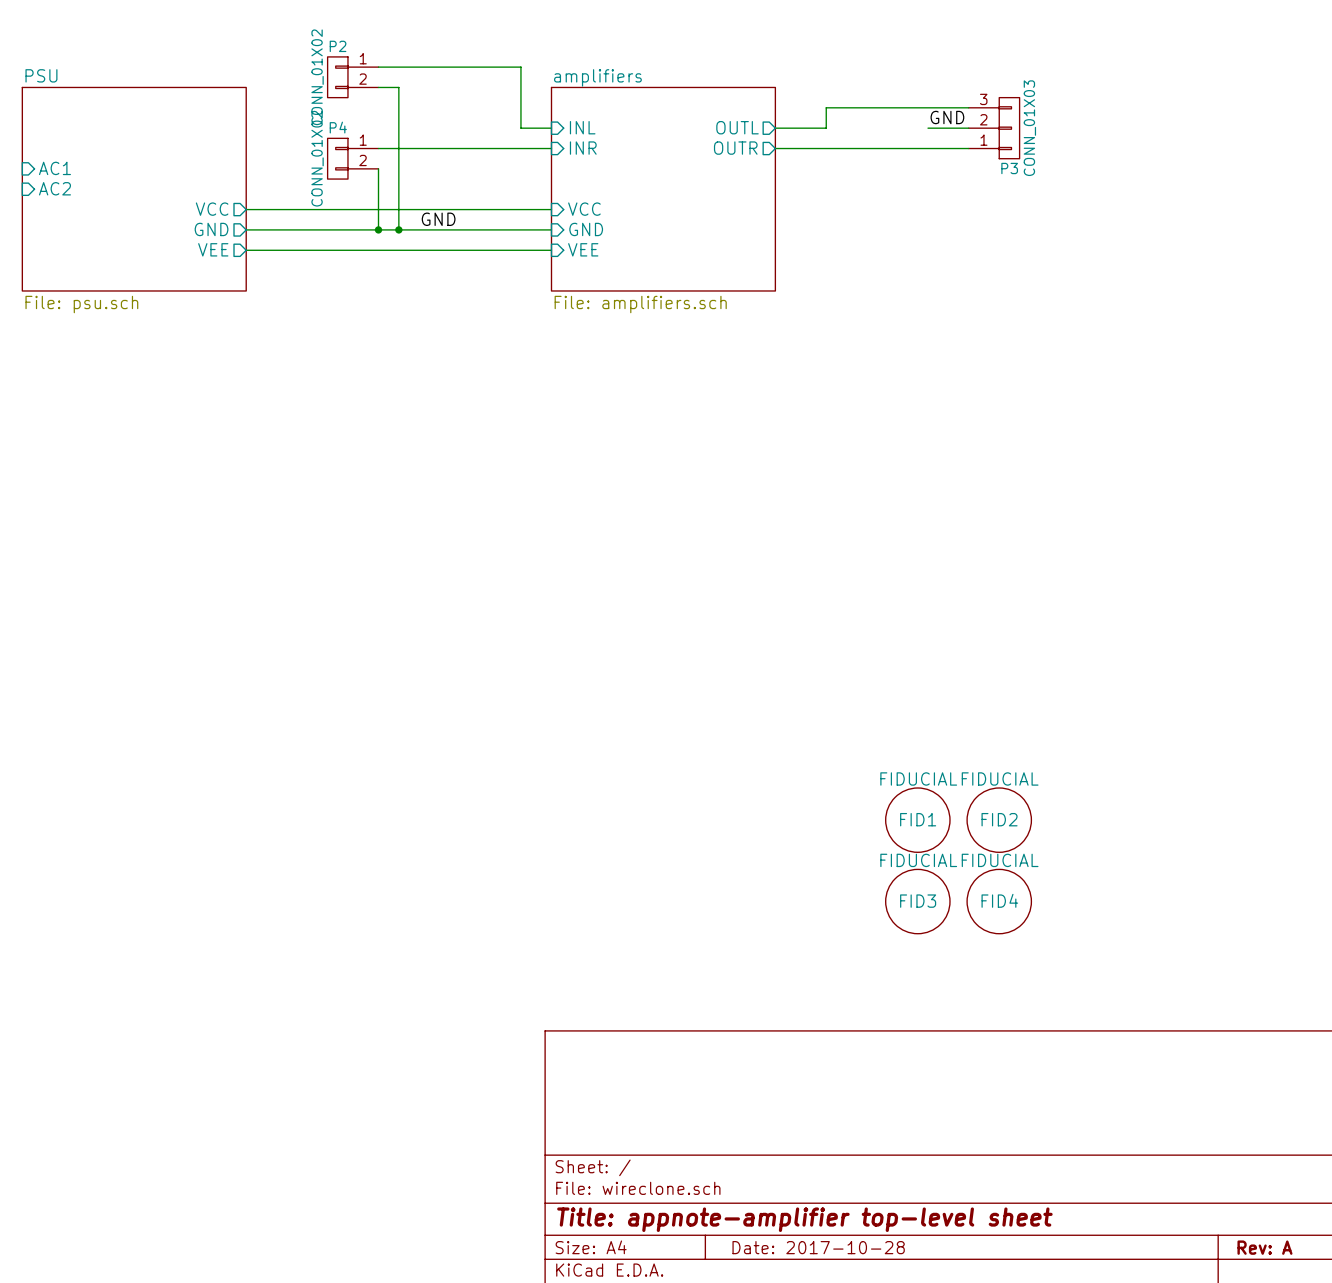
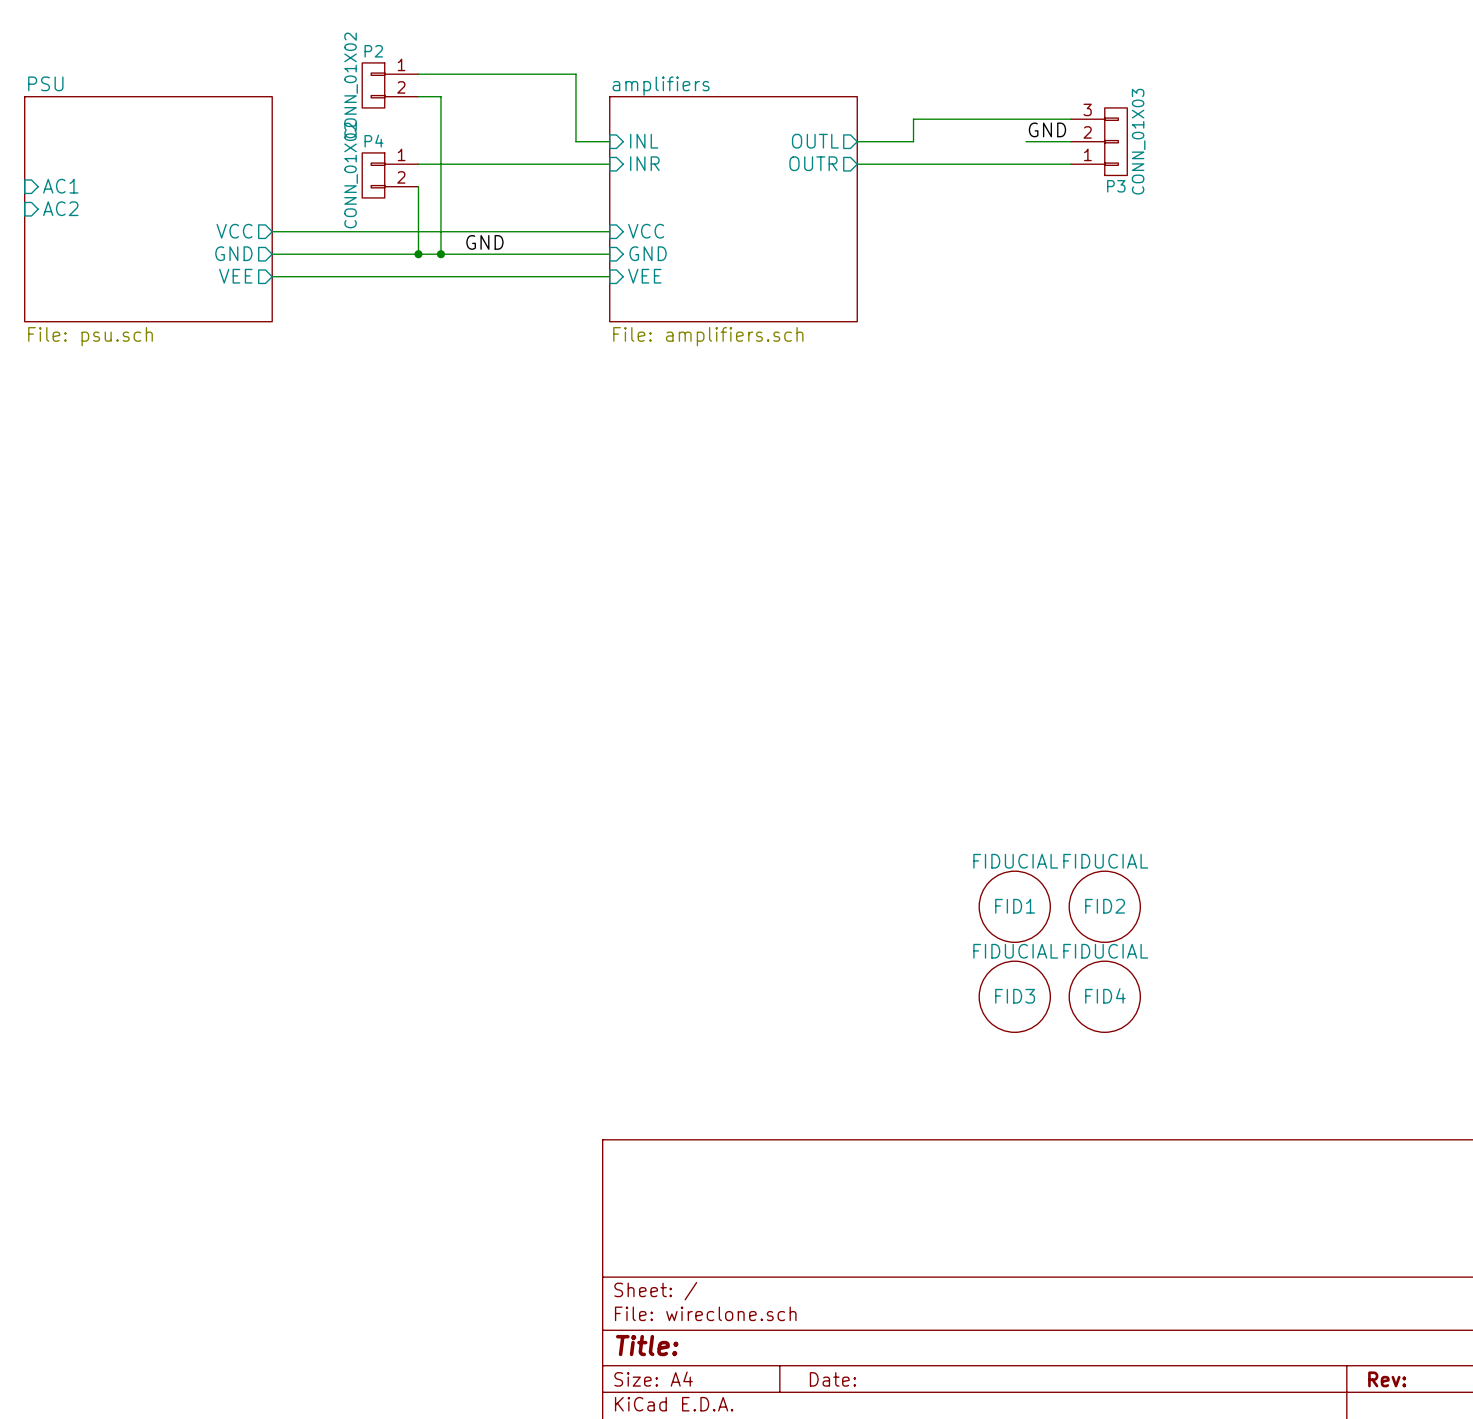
title block: Title: appnote-amplifier top-level sheet (804, 1219) -> Title: (647, 1345)
title block: Date: 2017-10-28 (818, 1247) -> Date: (832, 1379)
title block: Rev: A (1264, 1247) -> Rev: (1387, 1379)

